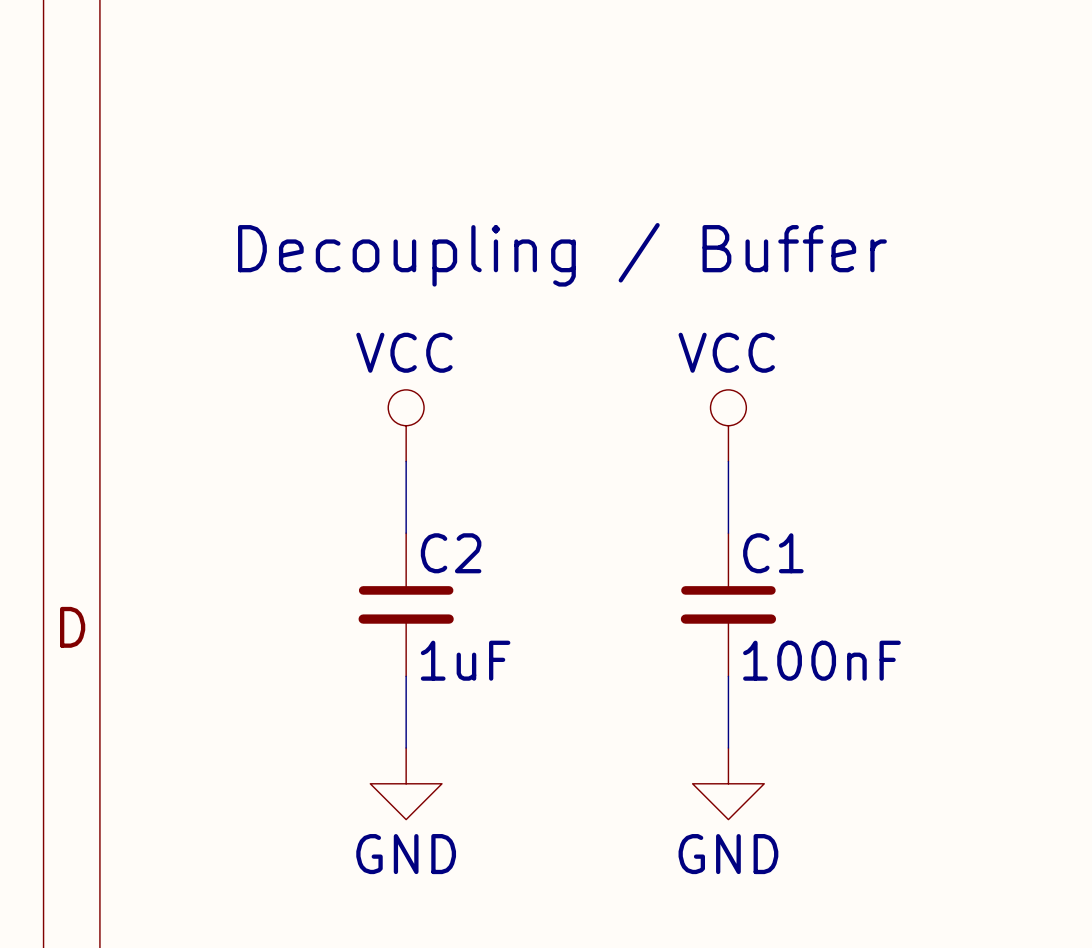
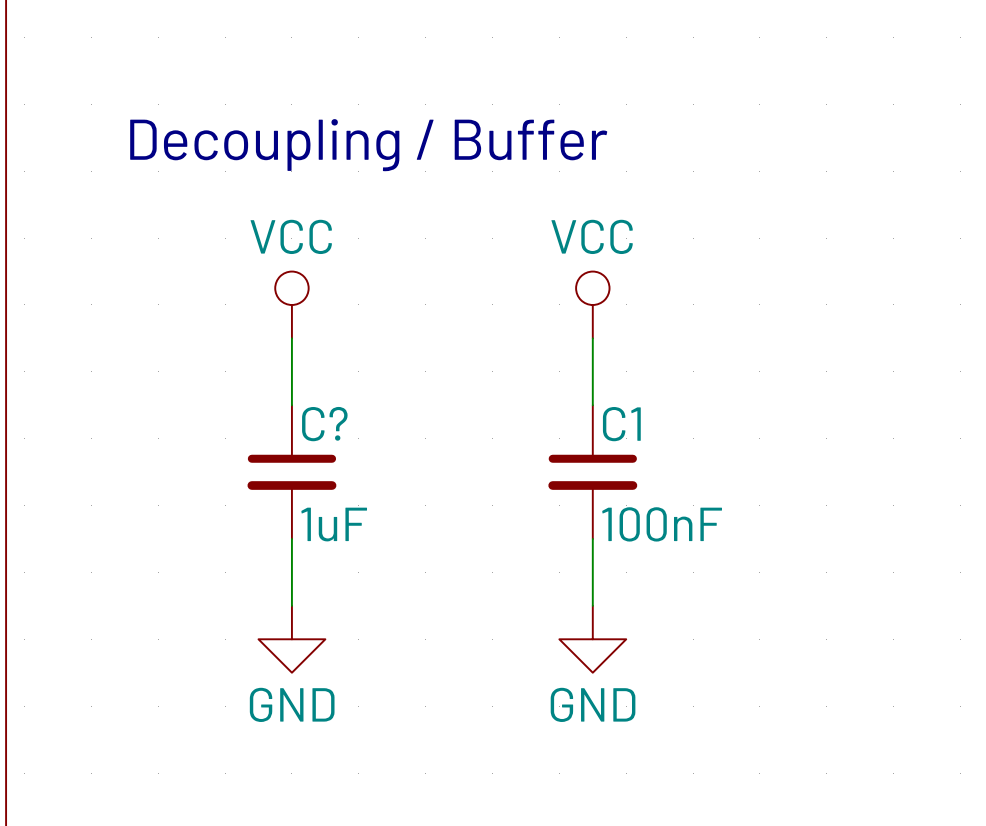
C2 name: C2 (451, 553) -> C? (324, 424)

